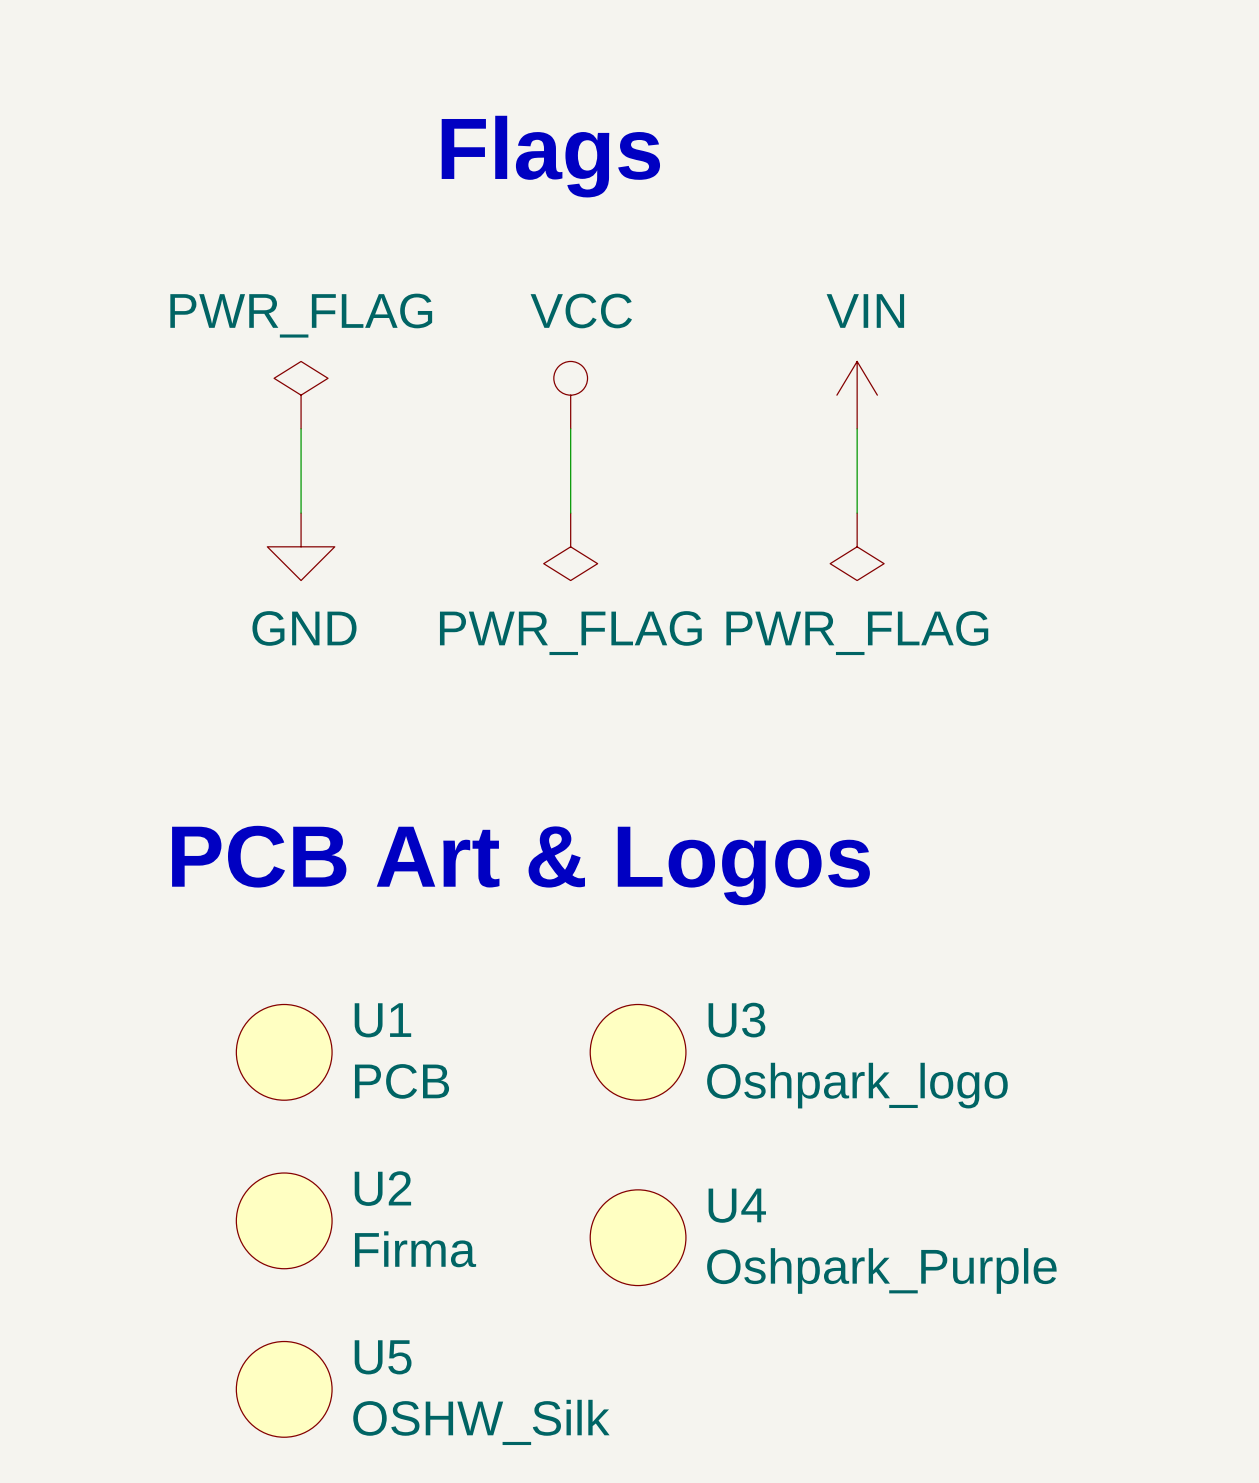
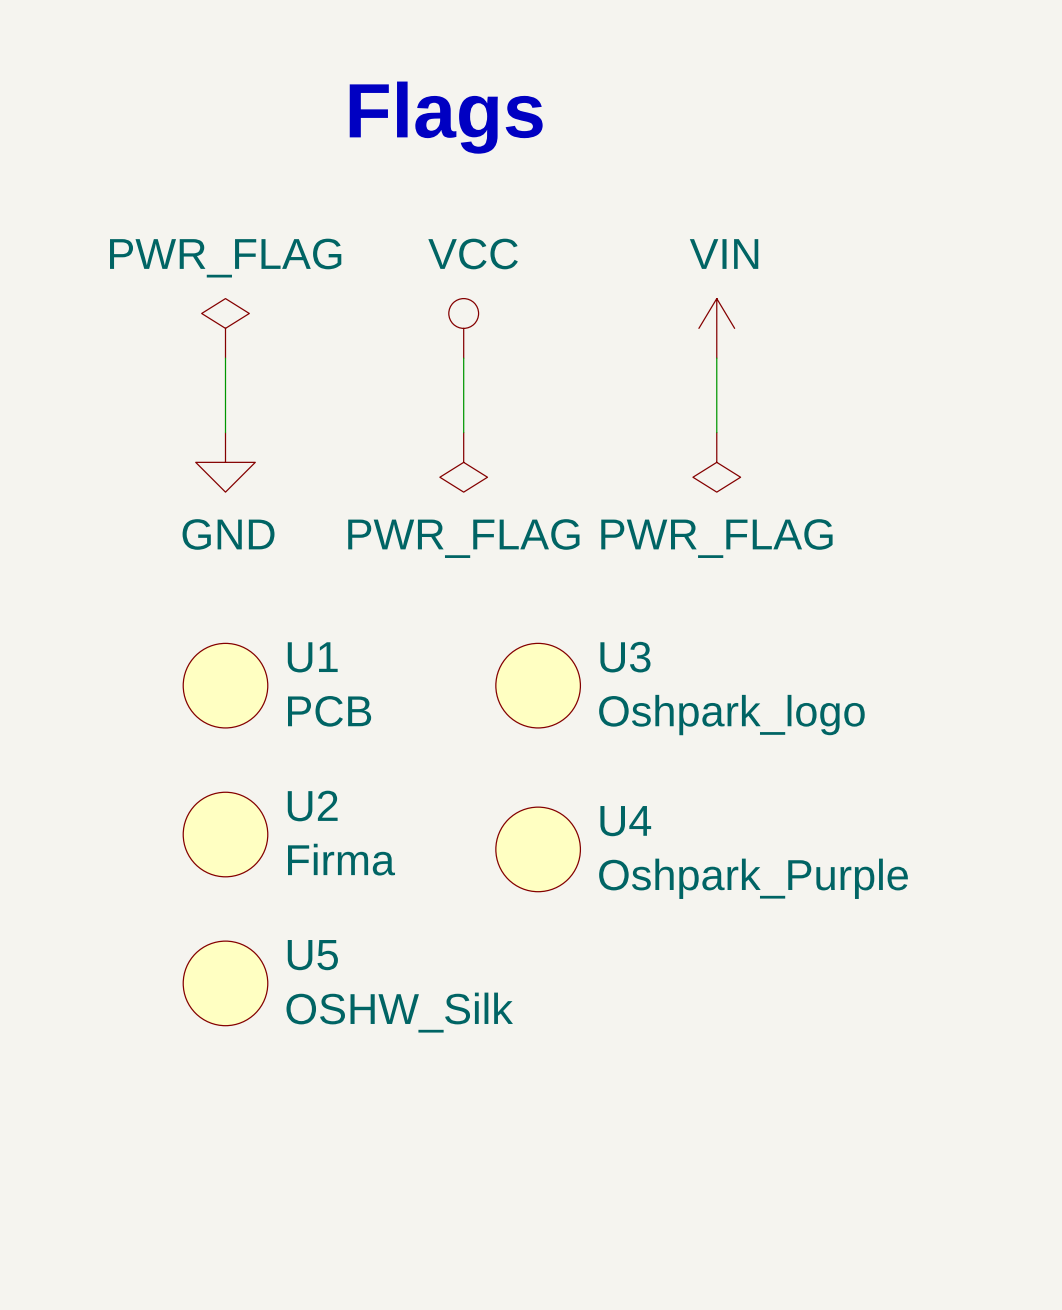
text: PCB Art & Logos (521, 865) -> none
U1 position: (284, 1052) -> (225, 685)
U3 position: (638, 1052) -> (538, 685)
U2 position: (284, 1220) -> (225, 834)
U4 position: (638, 1237) -> (538, 849)
U5 position: (284, 1389) -> (225, 983)

